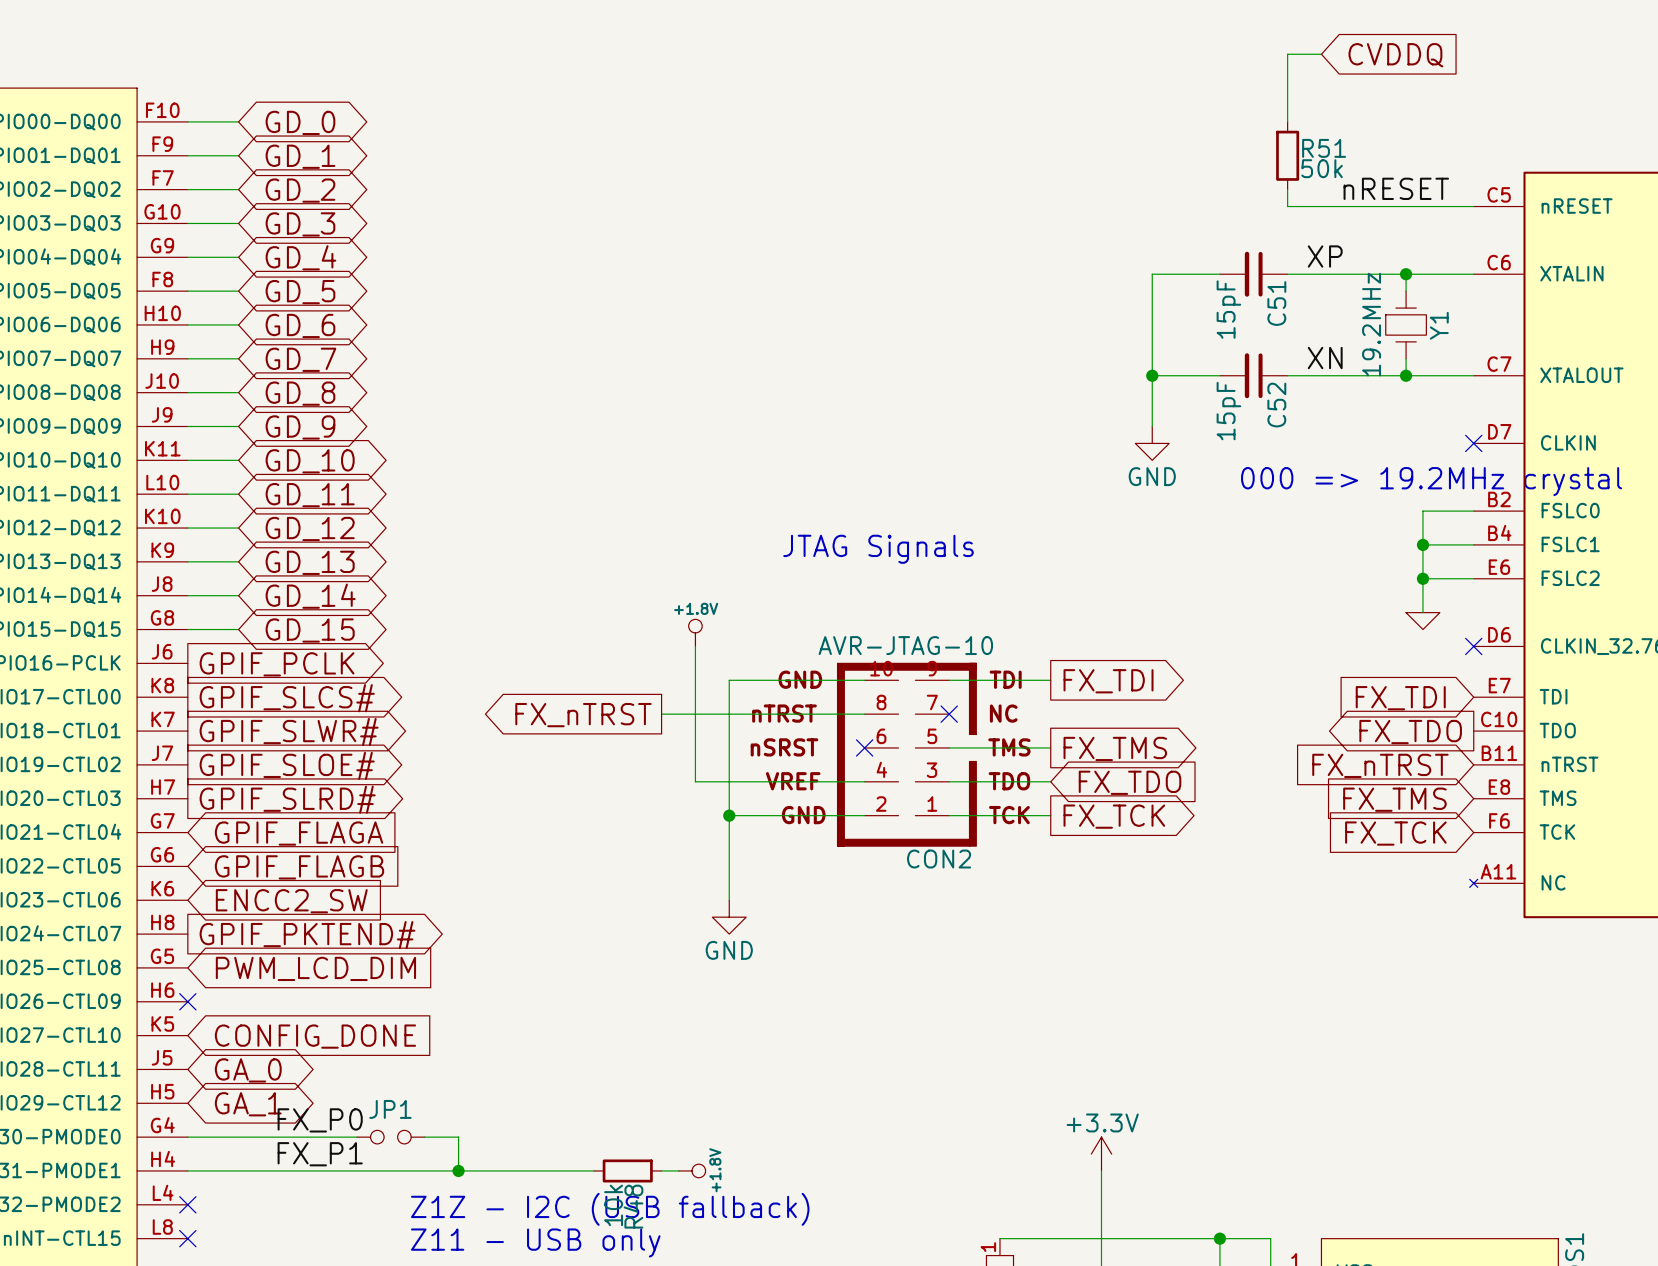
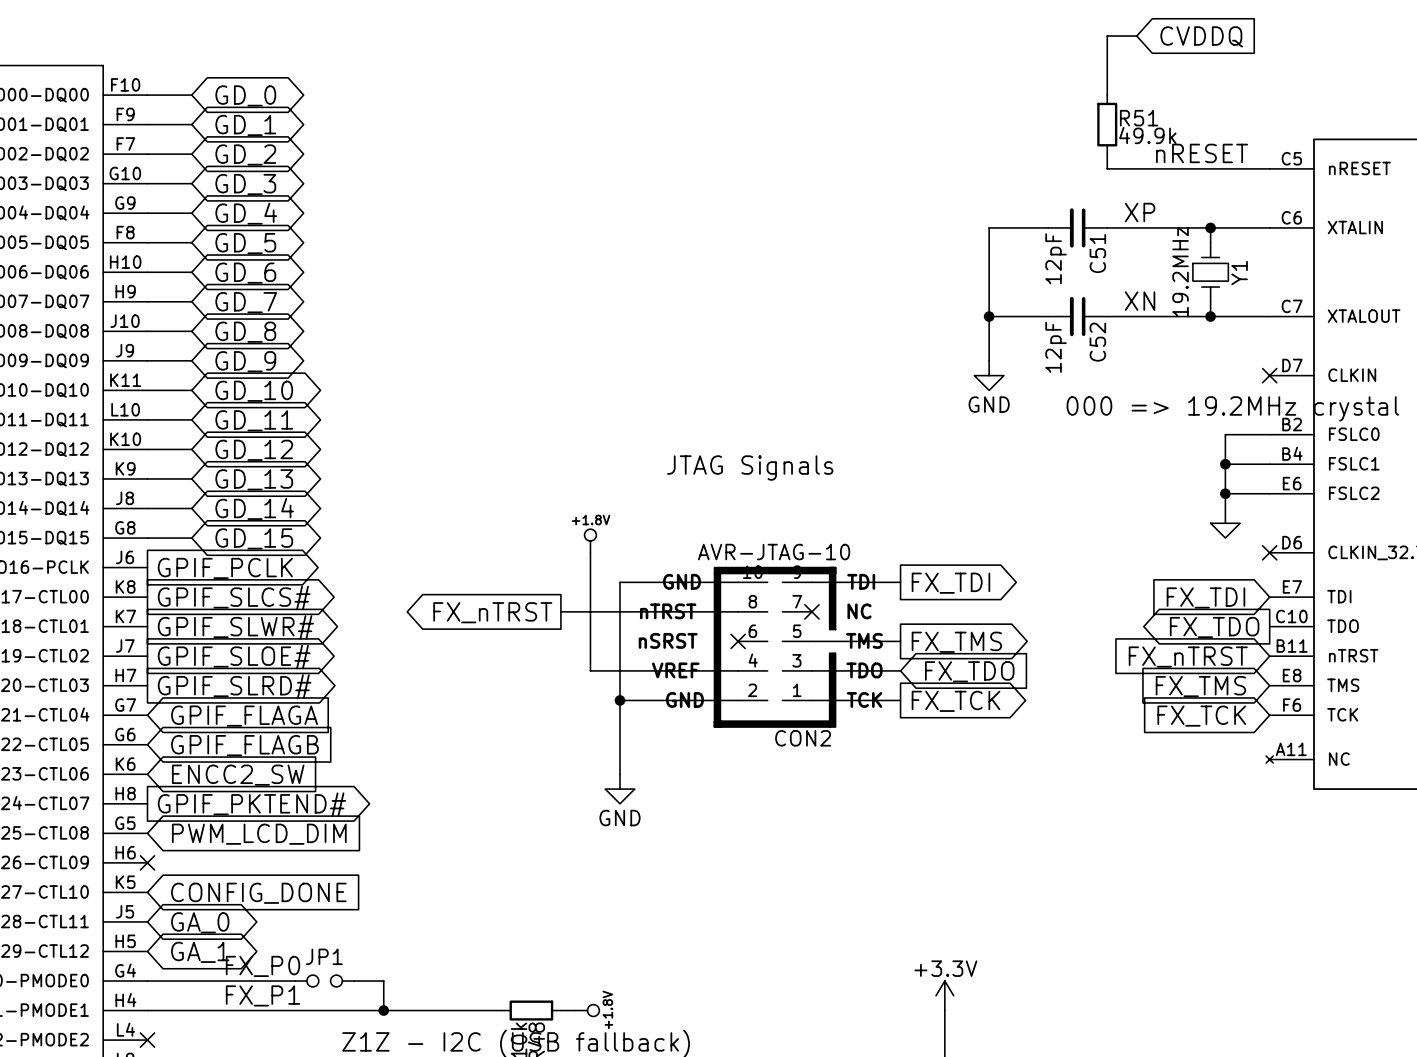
R51 value: 50k (1322, 168) -> 49.9k (1147, 135)
C51 value: 15pF (1228, 309) -> 12pF (1056, 258)
C52 value: 15pF (1228, 411) -> 12pF (1056, 347)

